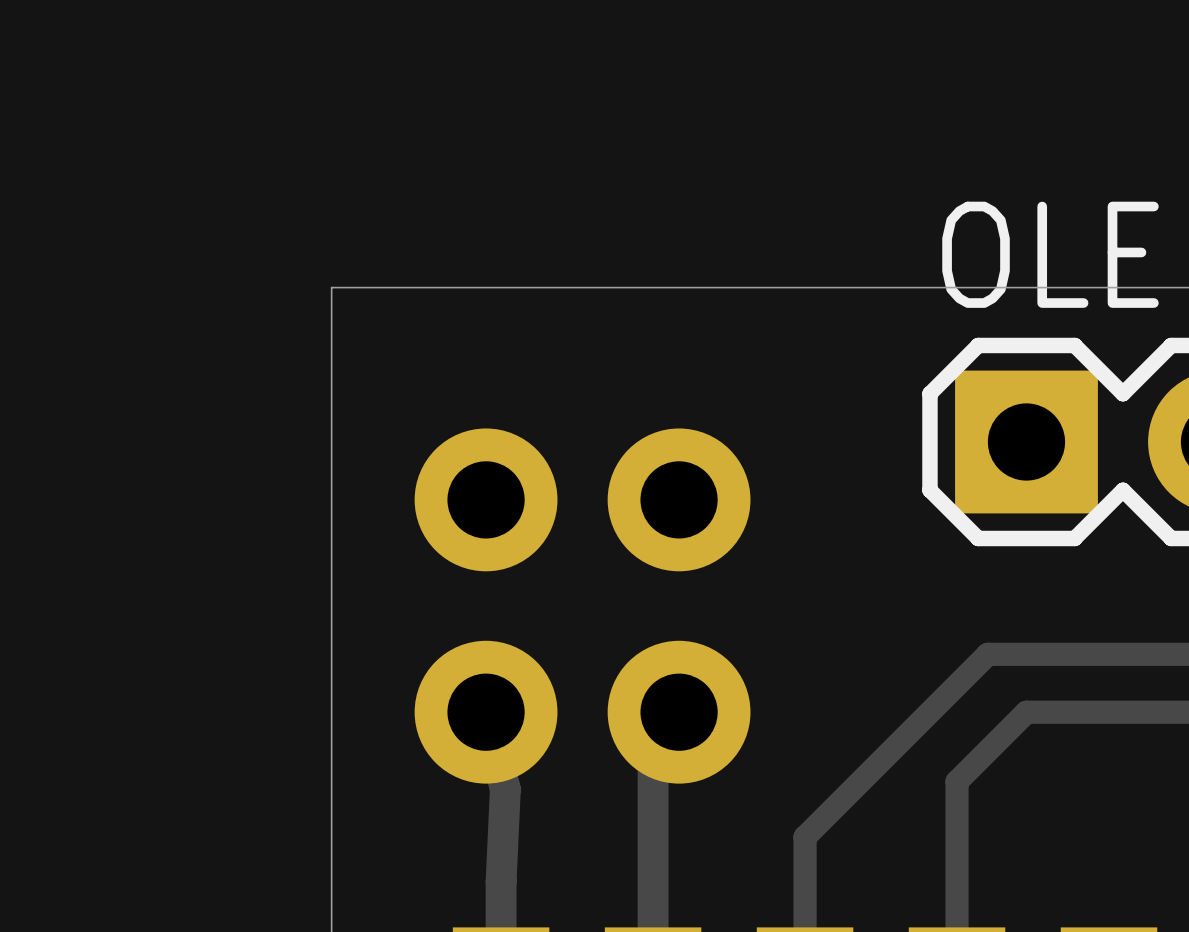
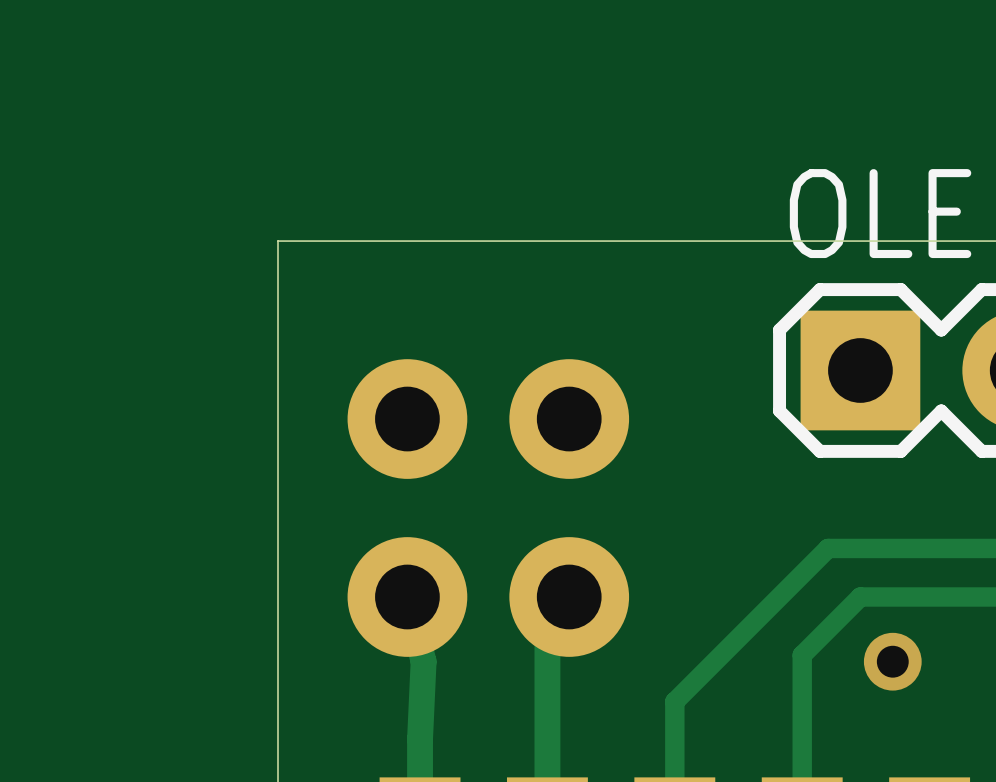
via: none -> (892, 661)

